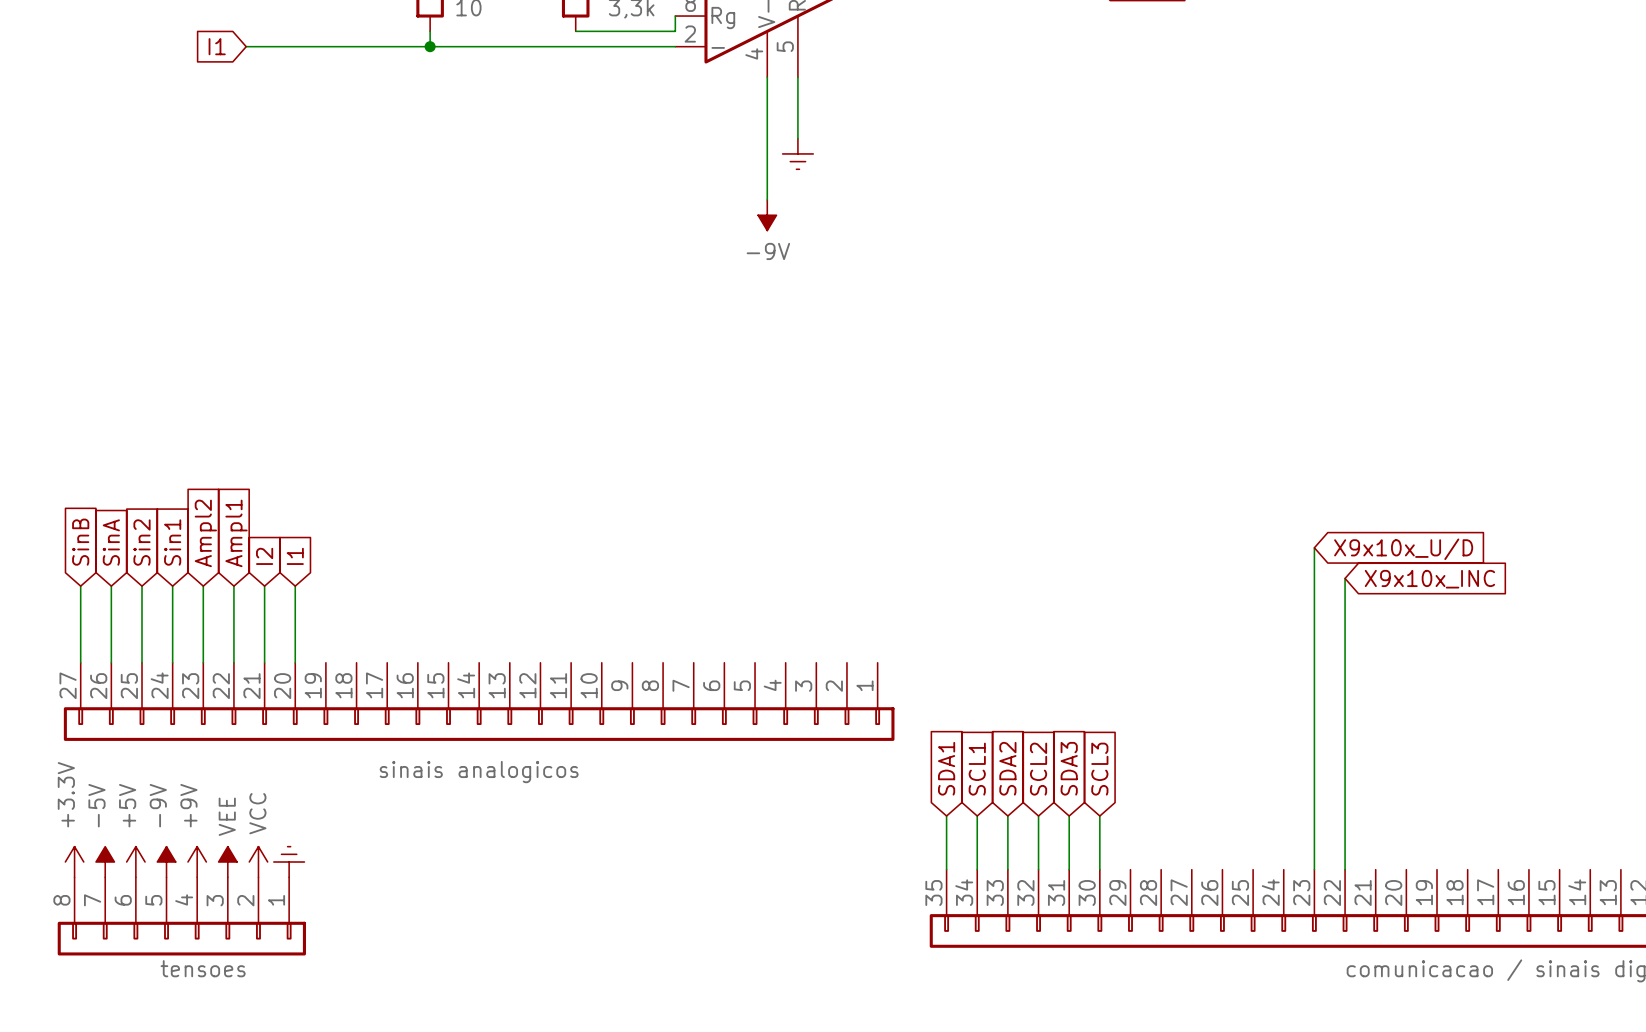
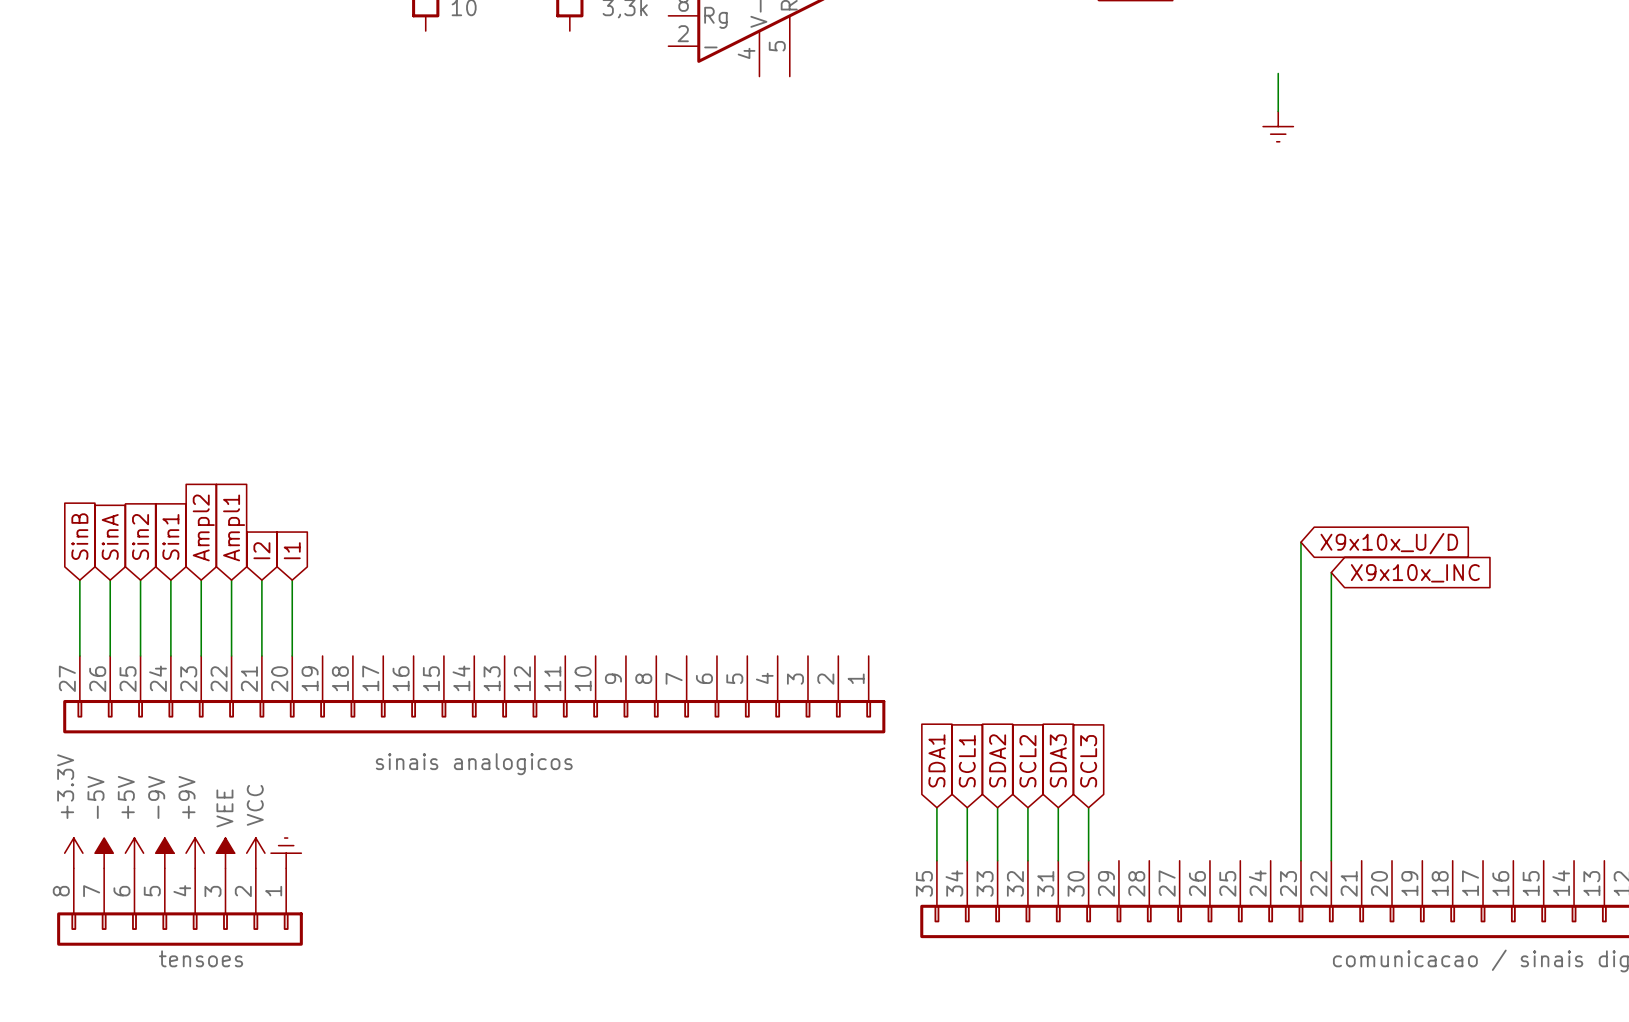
wire: (675, 16) (675, 31) (575, 31) -> none
wire: (430, 31) (430, 46) -> none
global label: I1 (217, 46) -> none
wire: (246, 46) (675, 46) -> none
junction: (430, 46) -> none
wire: none -> (1278, 73) (1278, 111)
wire: (767, 77) (767, 199) -> none
wire: (797, 77) (797, 138) -> none
power symbol: none -> (1278, 126)
power symbol: (797, 153) -> none
power symbol: -9V (767, 215) -> none

